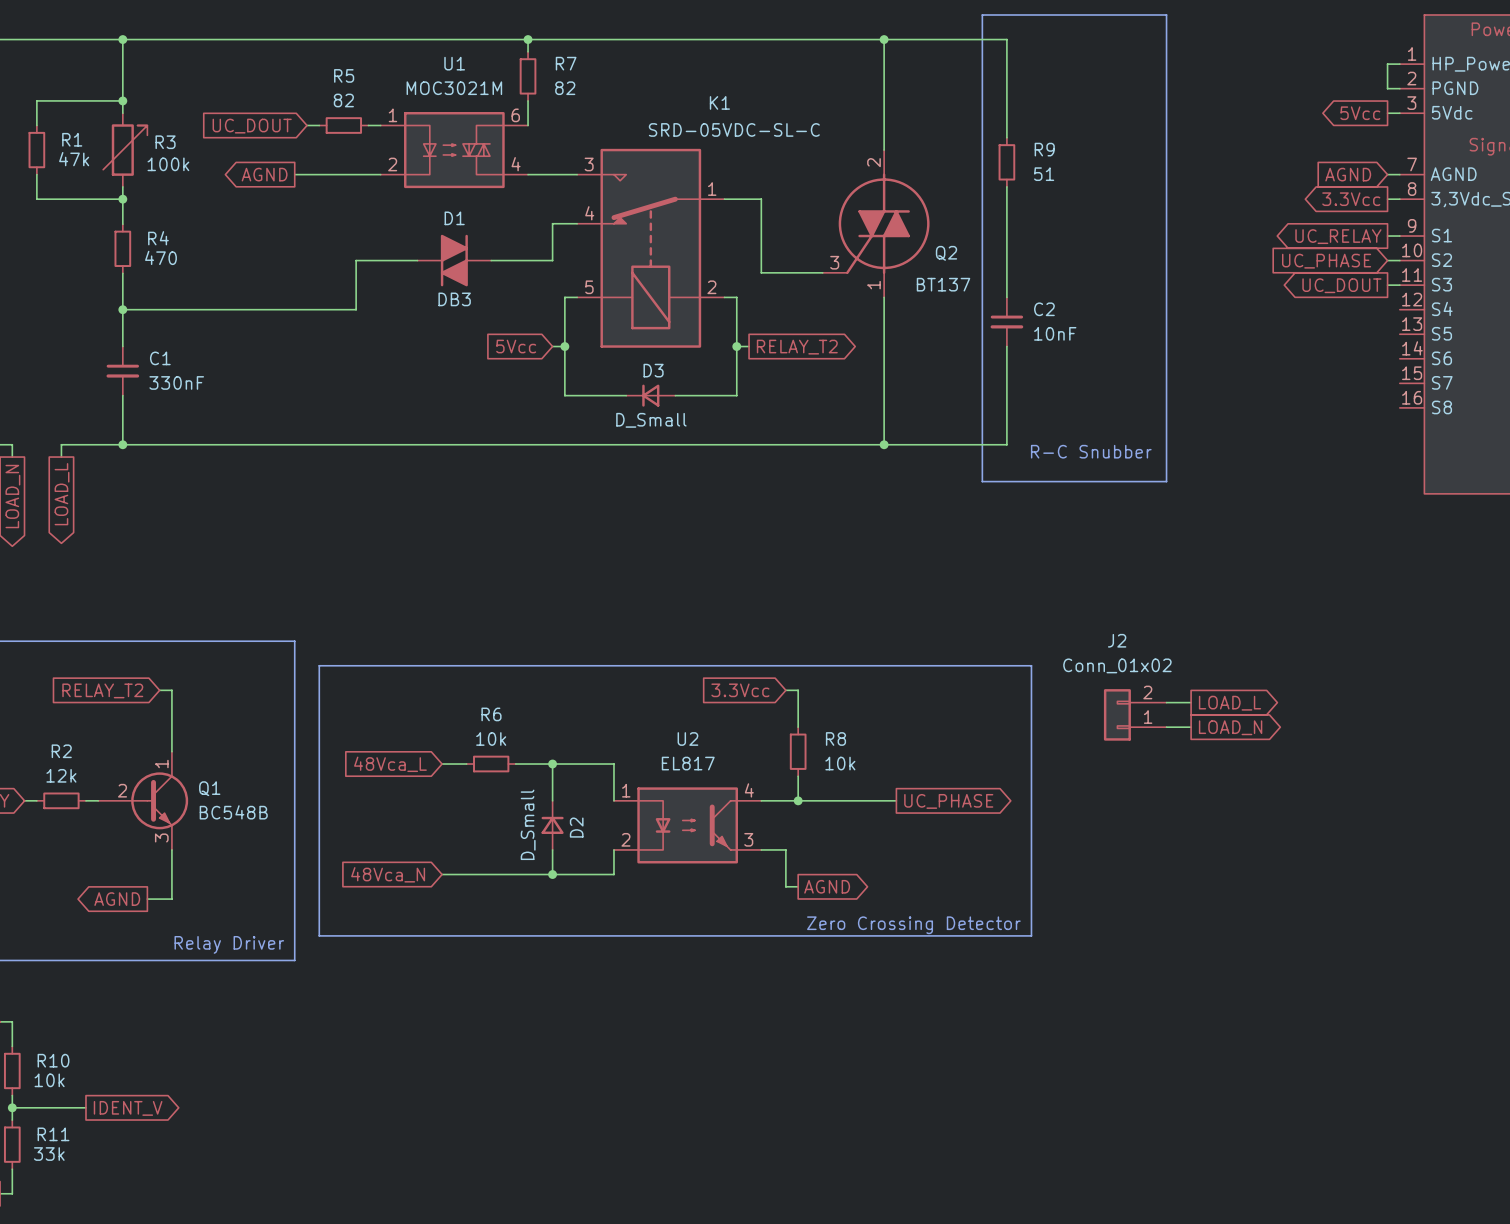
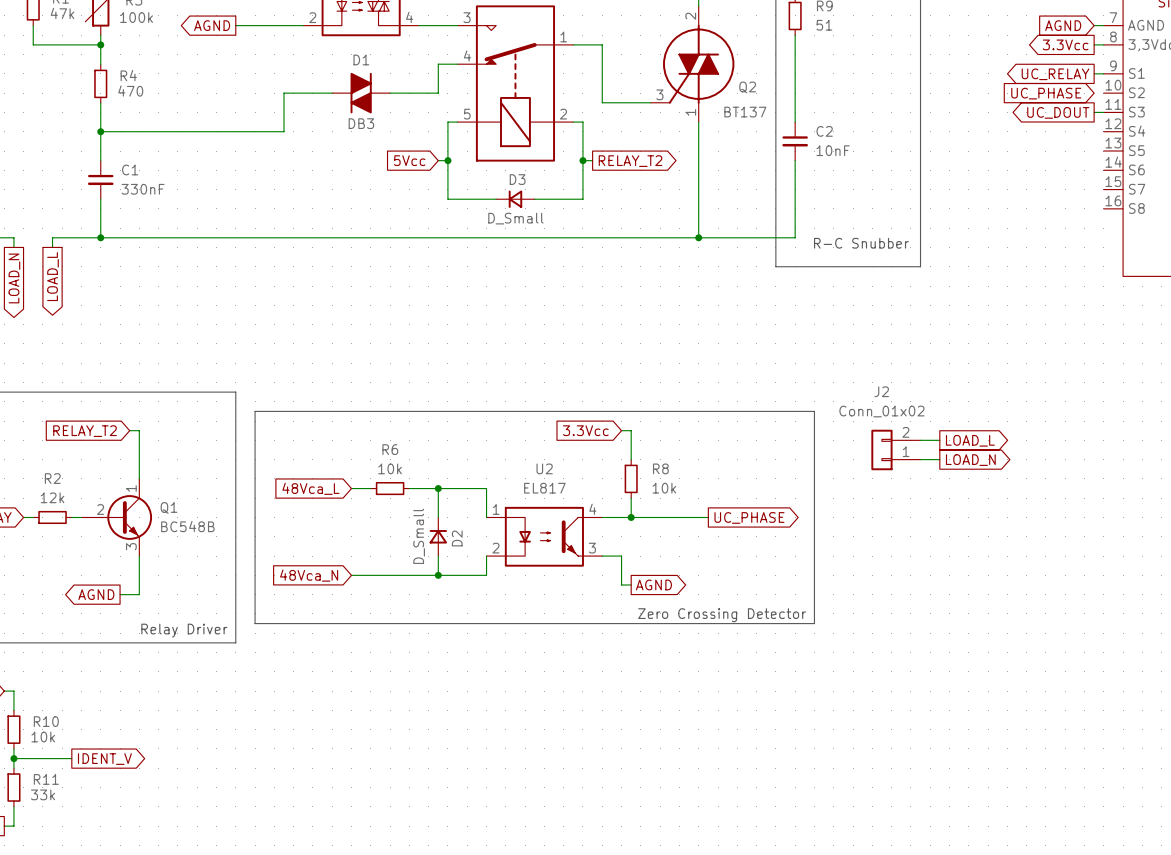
wire: (1387, 260) (1399, 260) -> none

